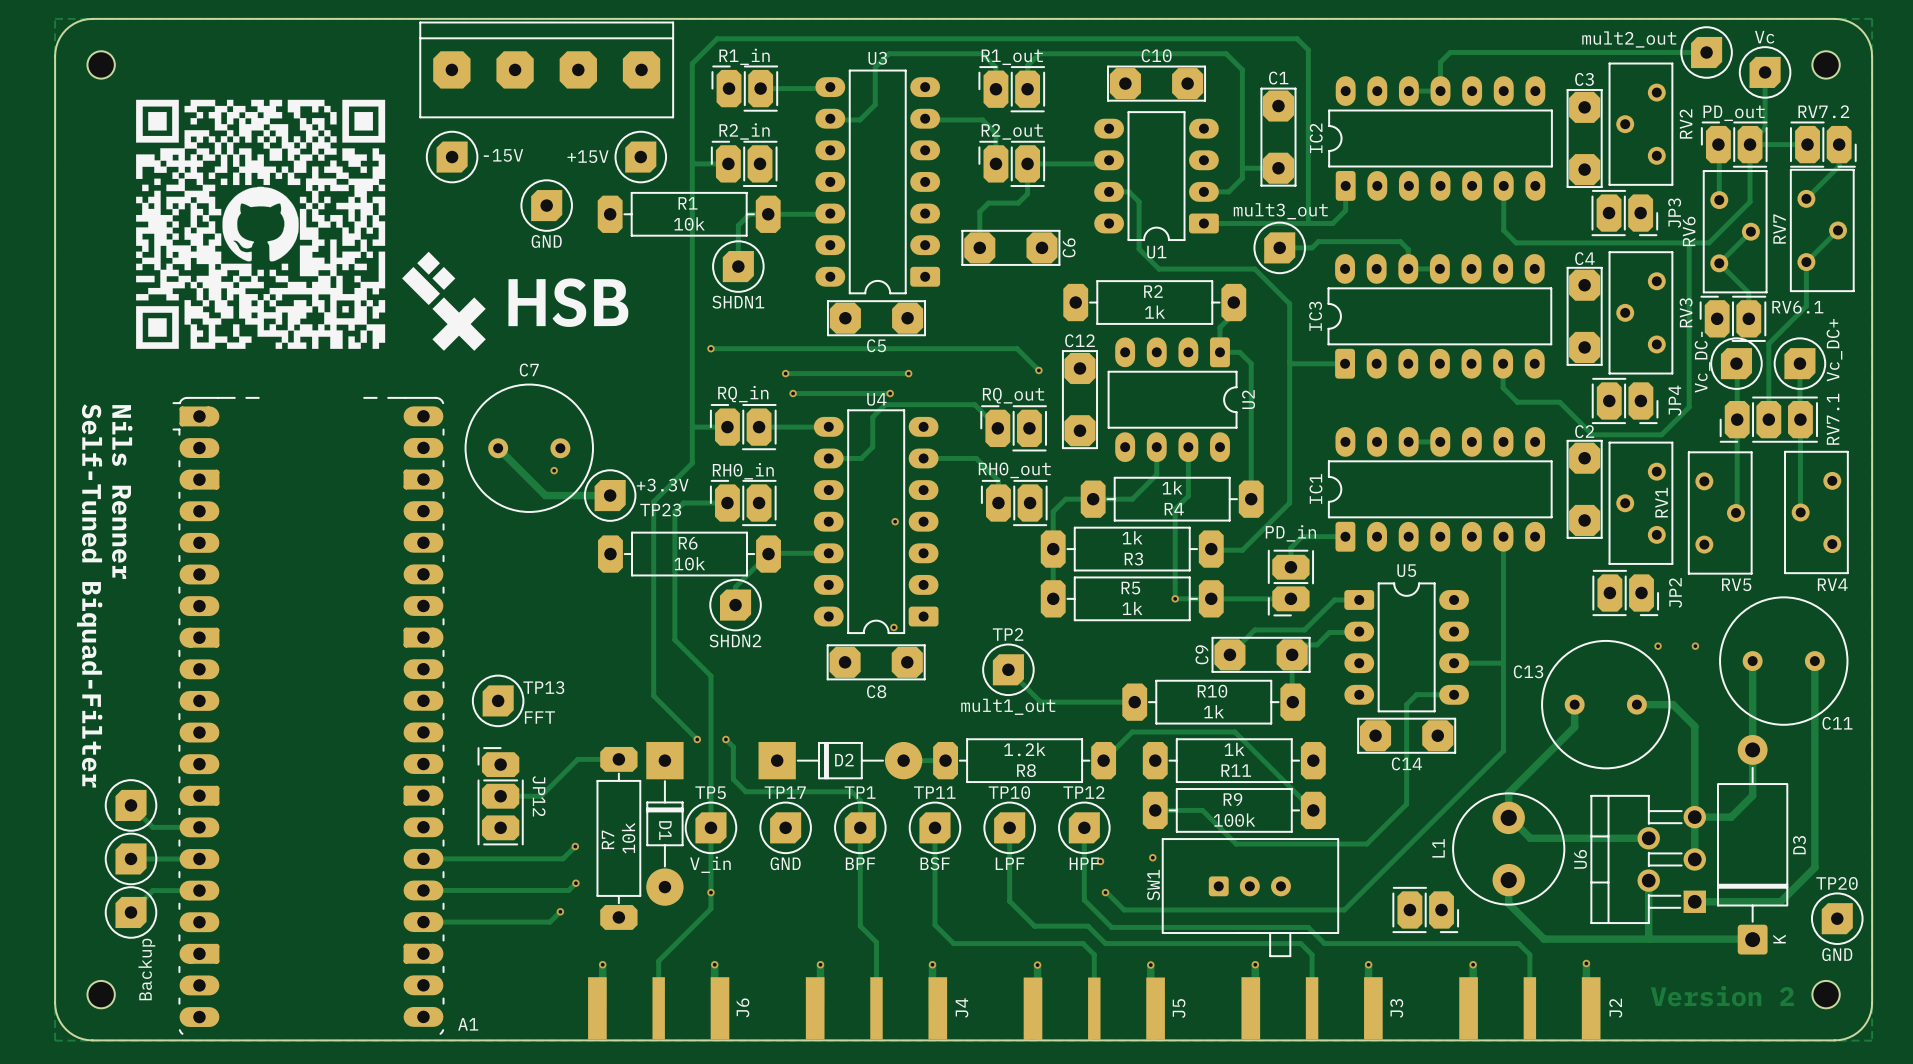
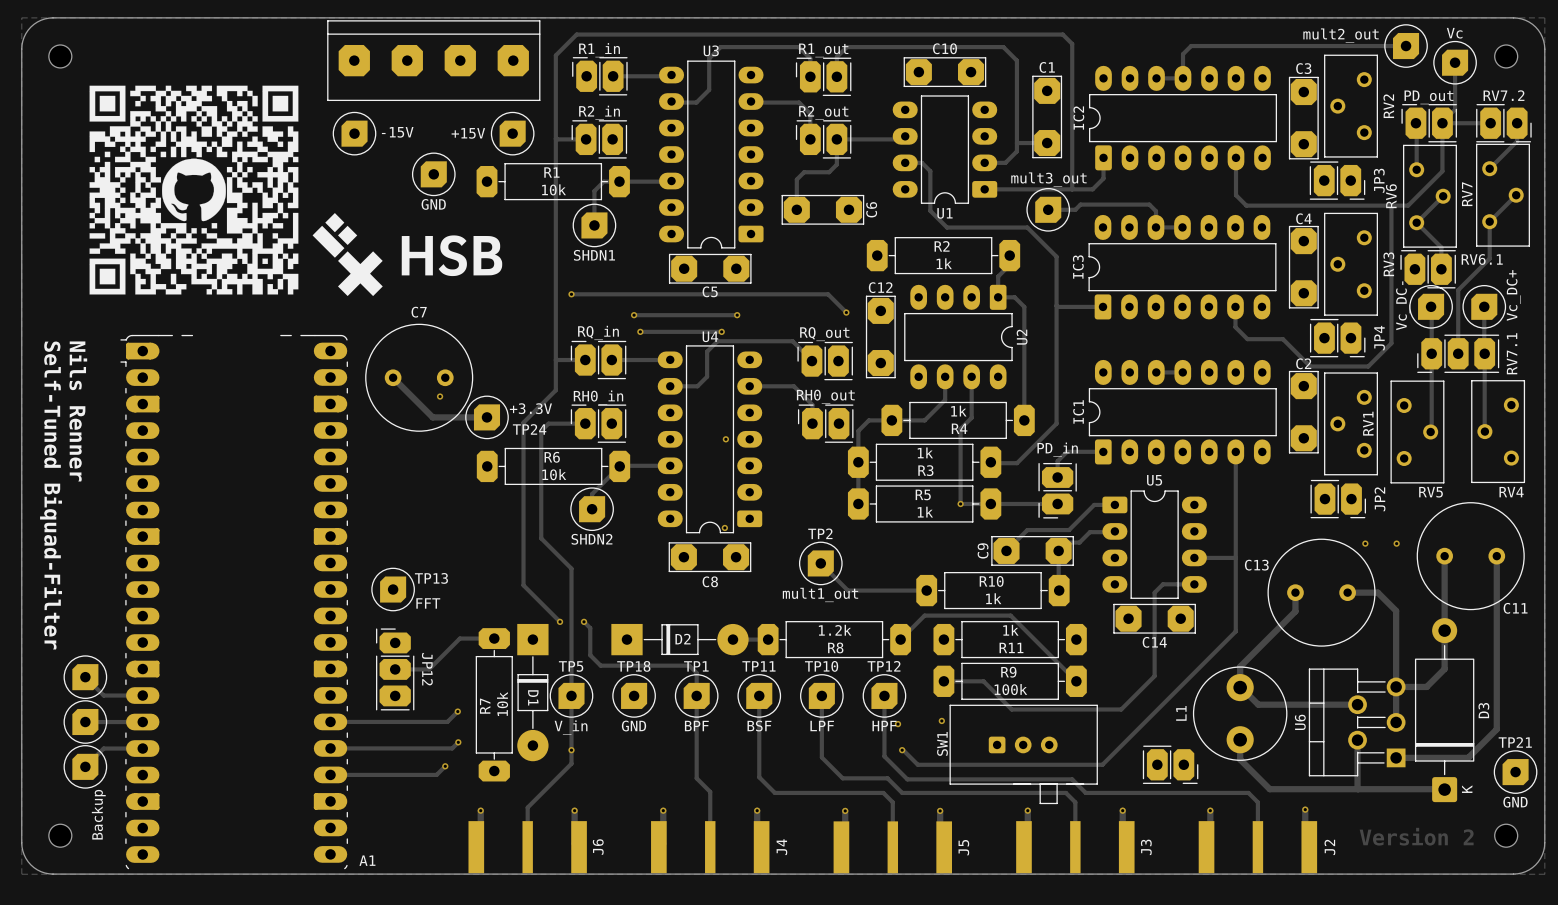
TP23 name: TP23 (660, 510) -> TP24 (529, 429)
TP17 name: TP17 (785, 792) -> TP18 (633, 666)
TP20 name: TP20 (1837, 883) -> TP21 (1515, 742)

